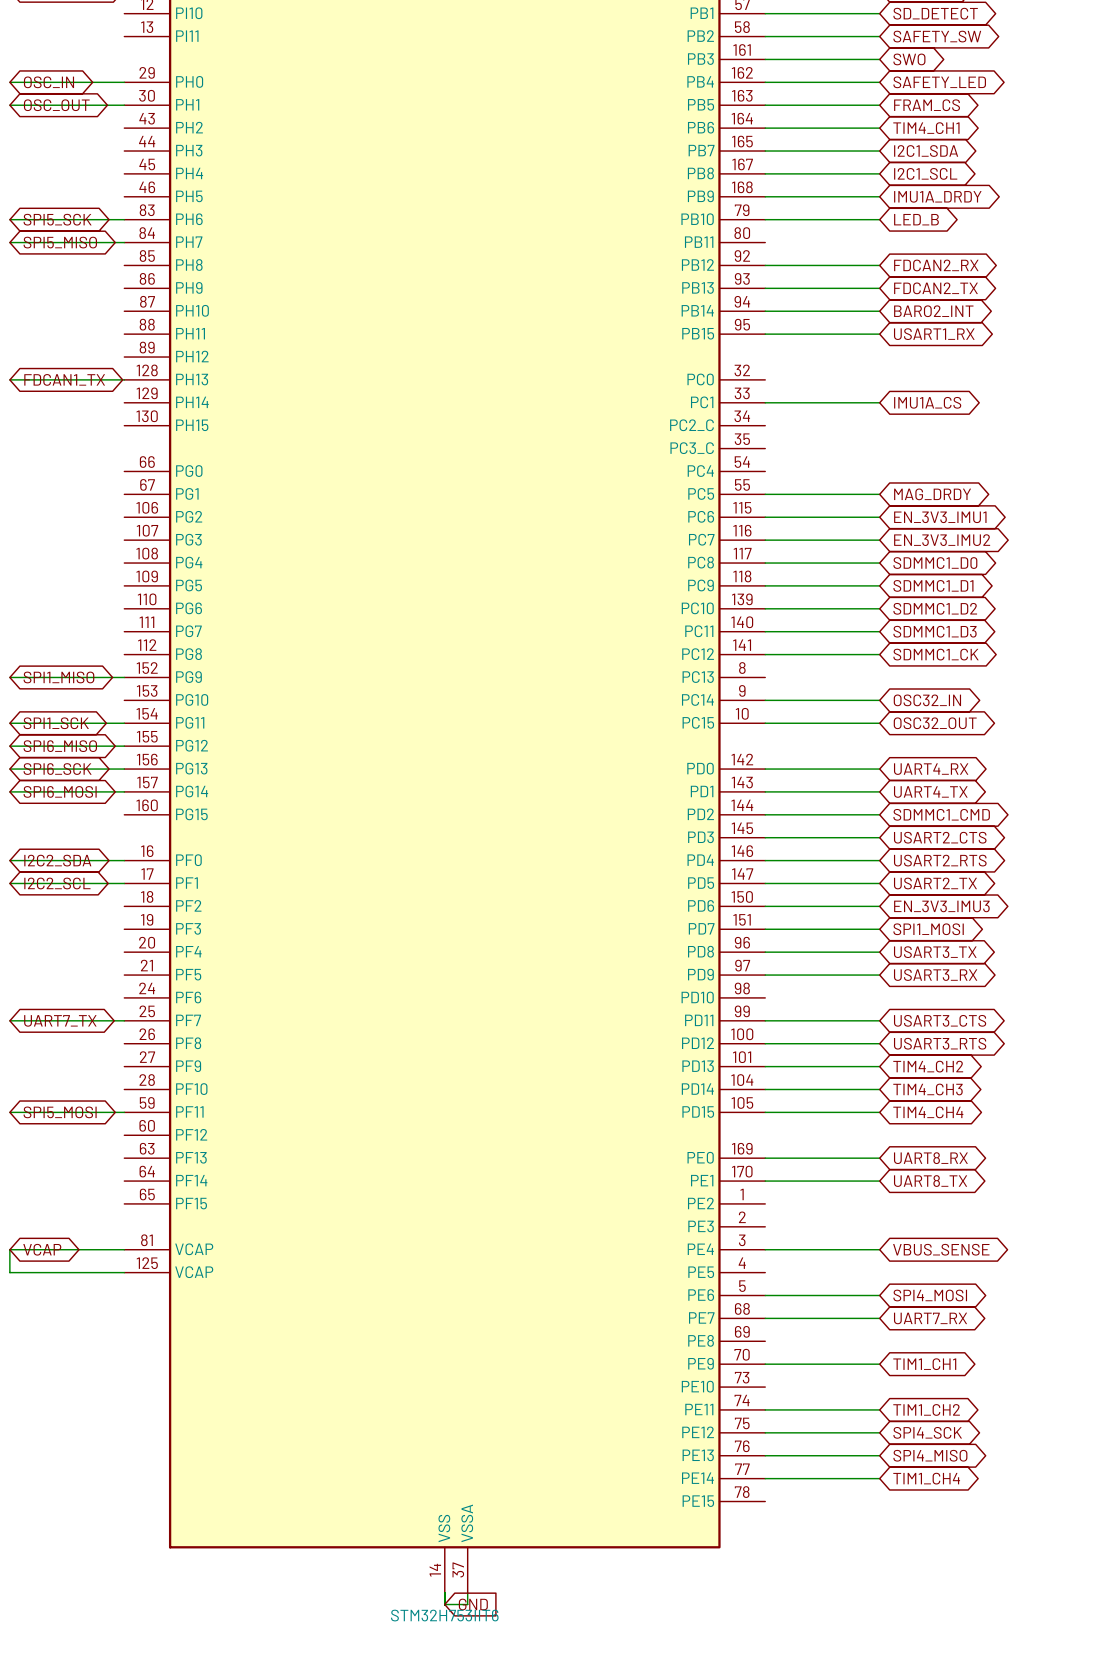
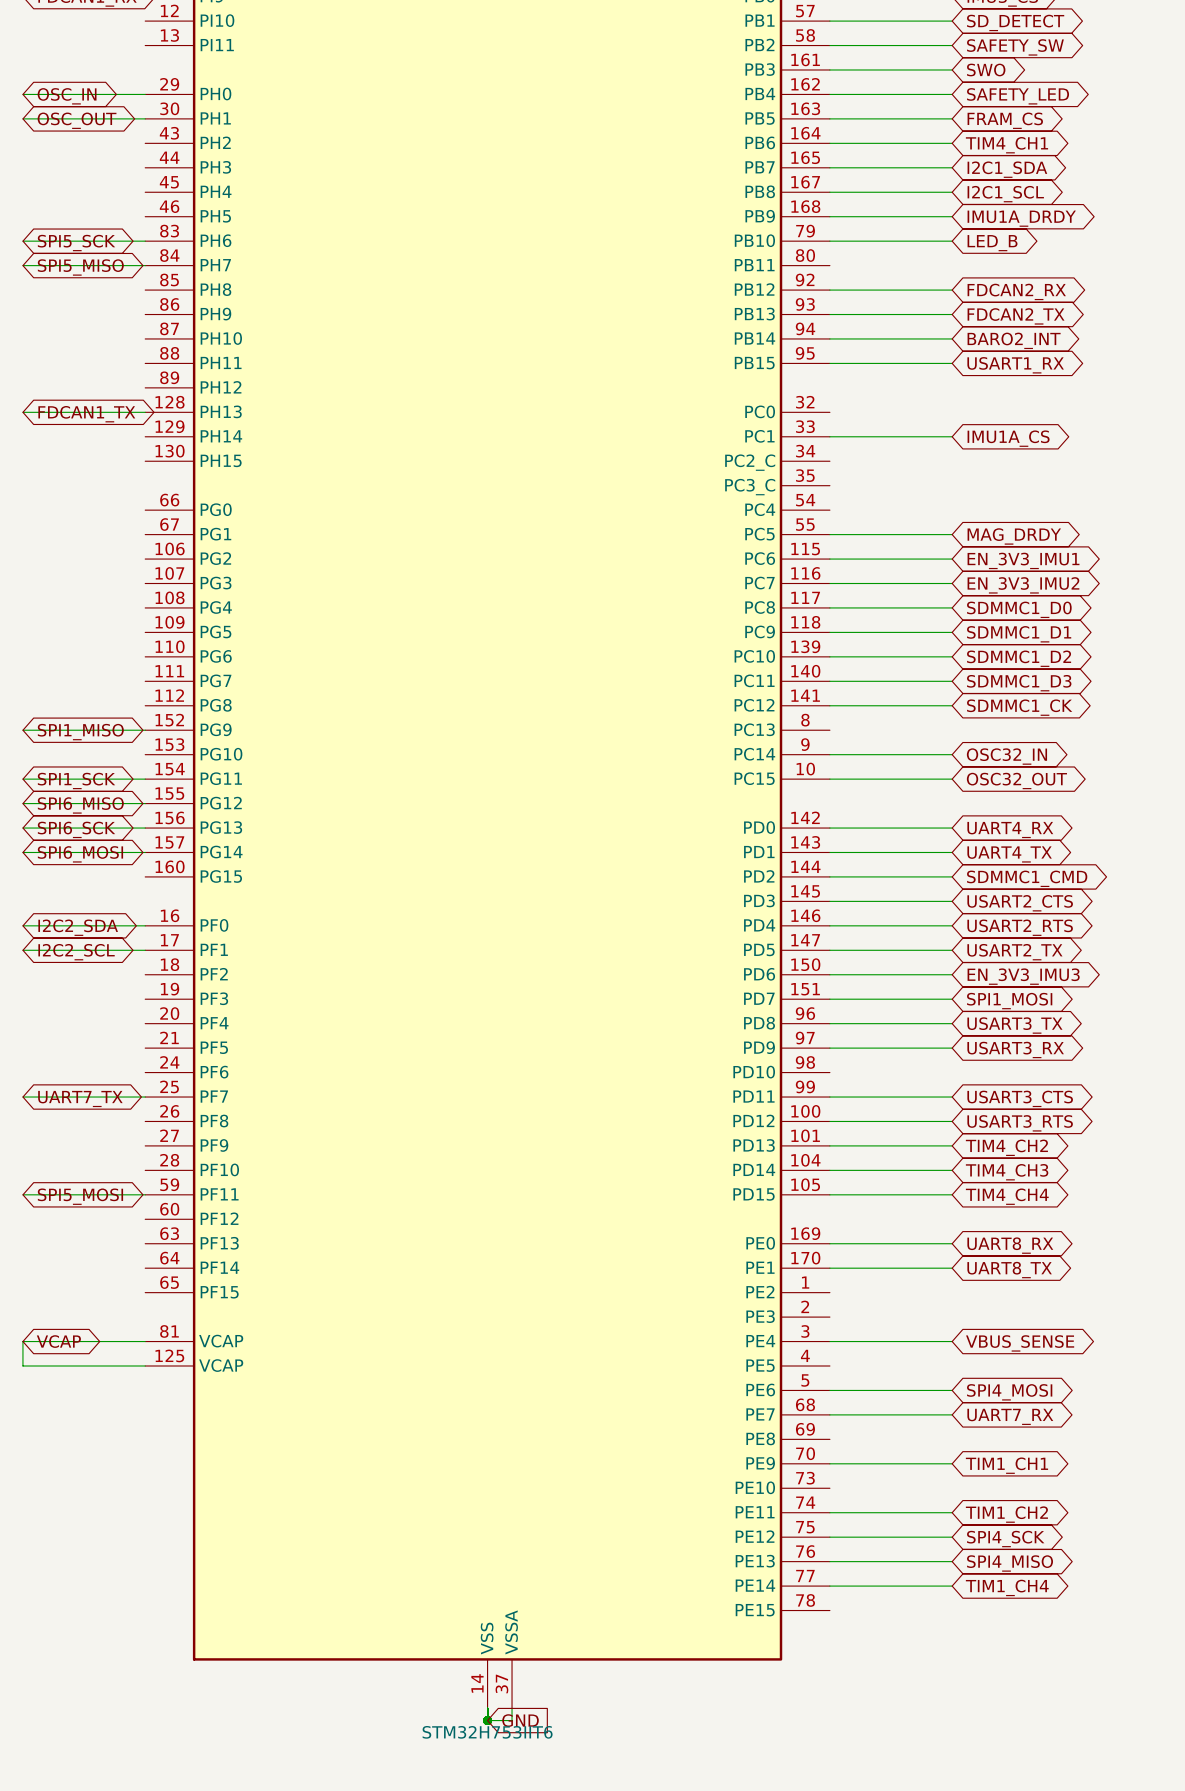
junction: none -> (487, 1720)

